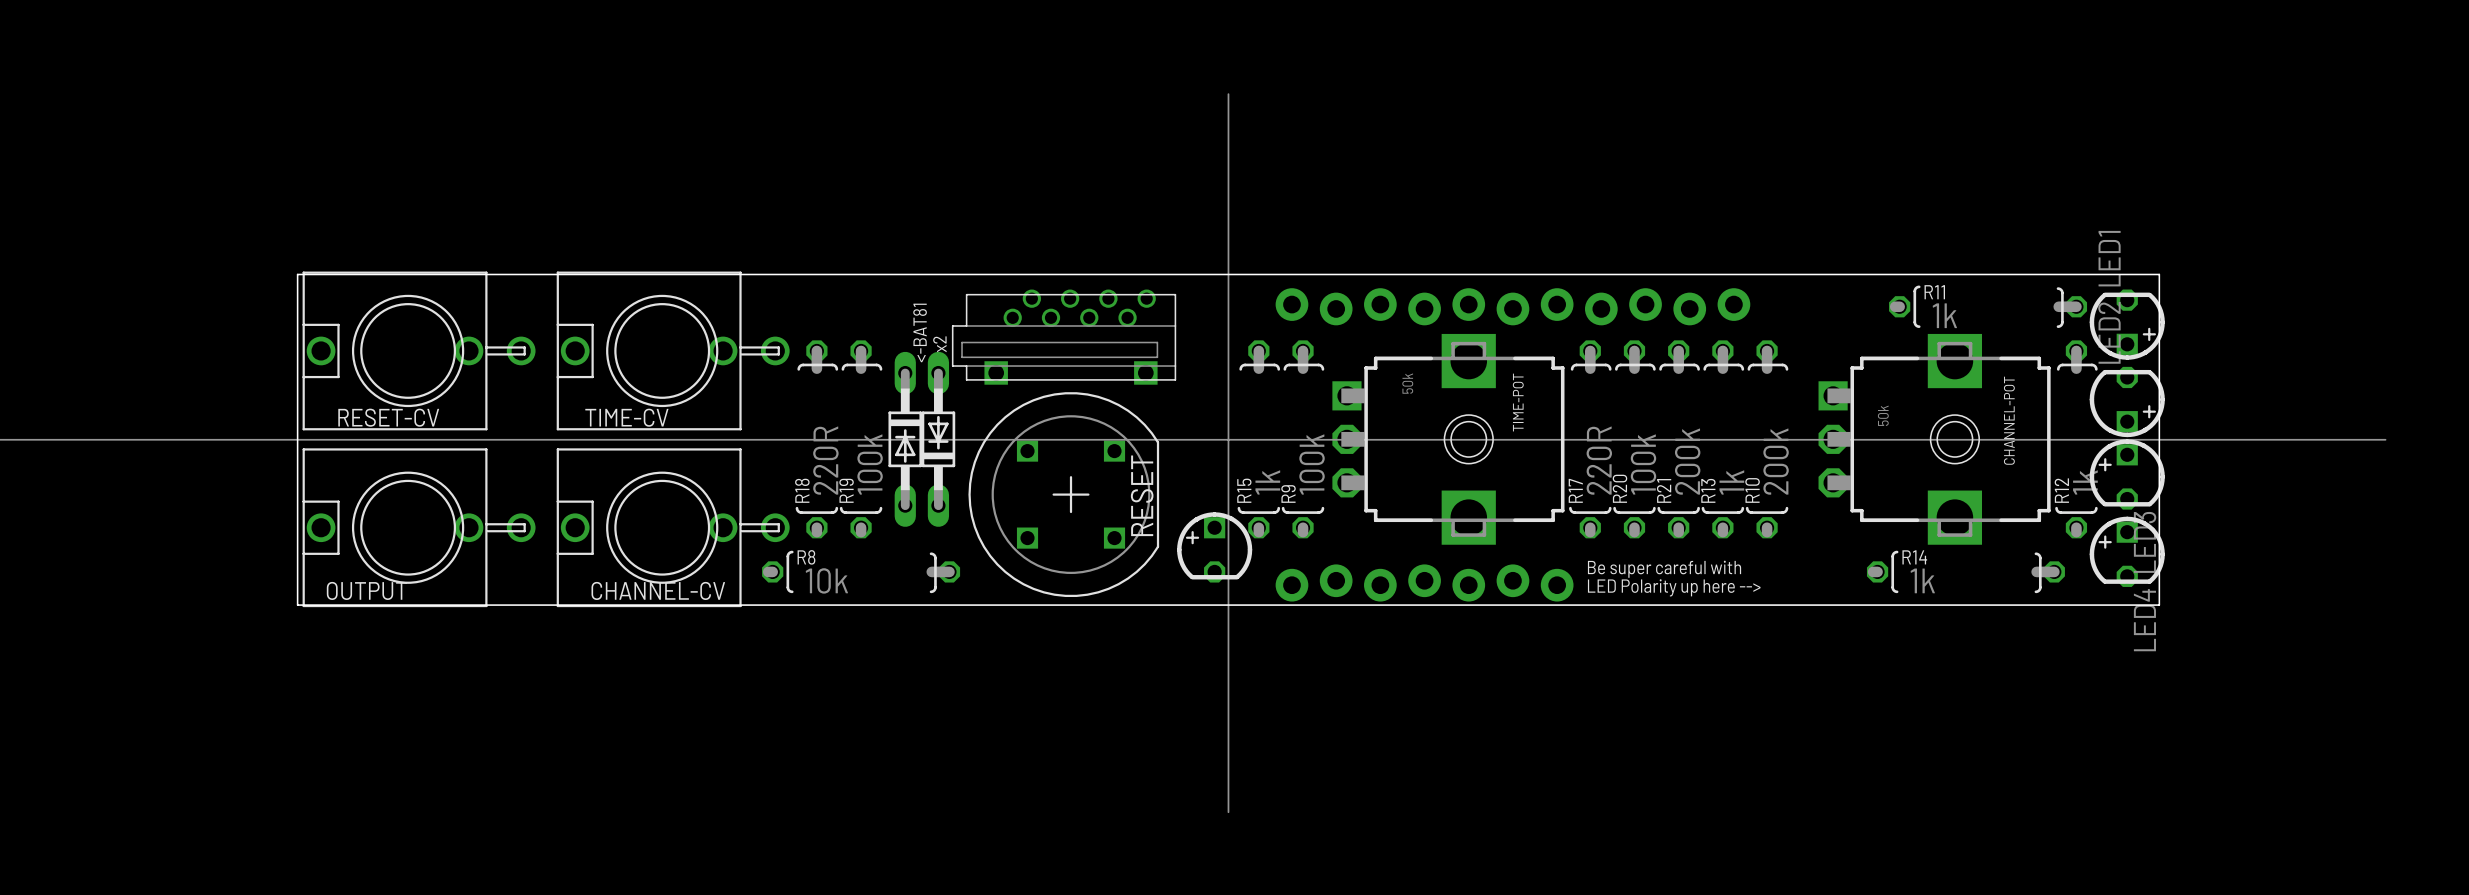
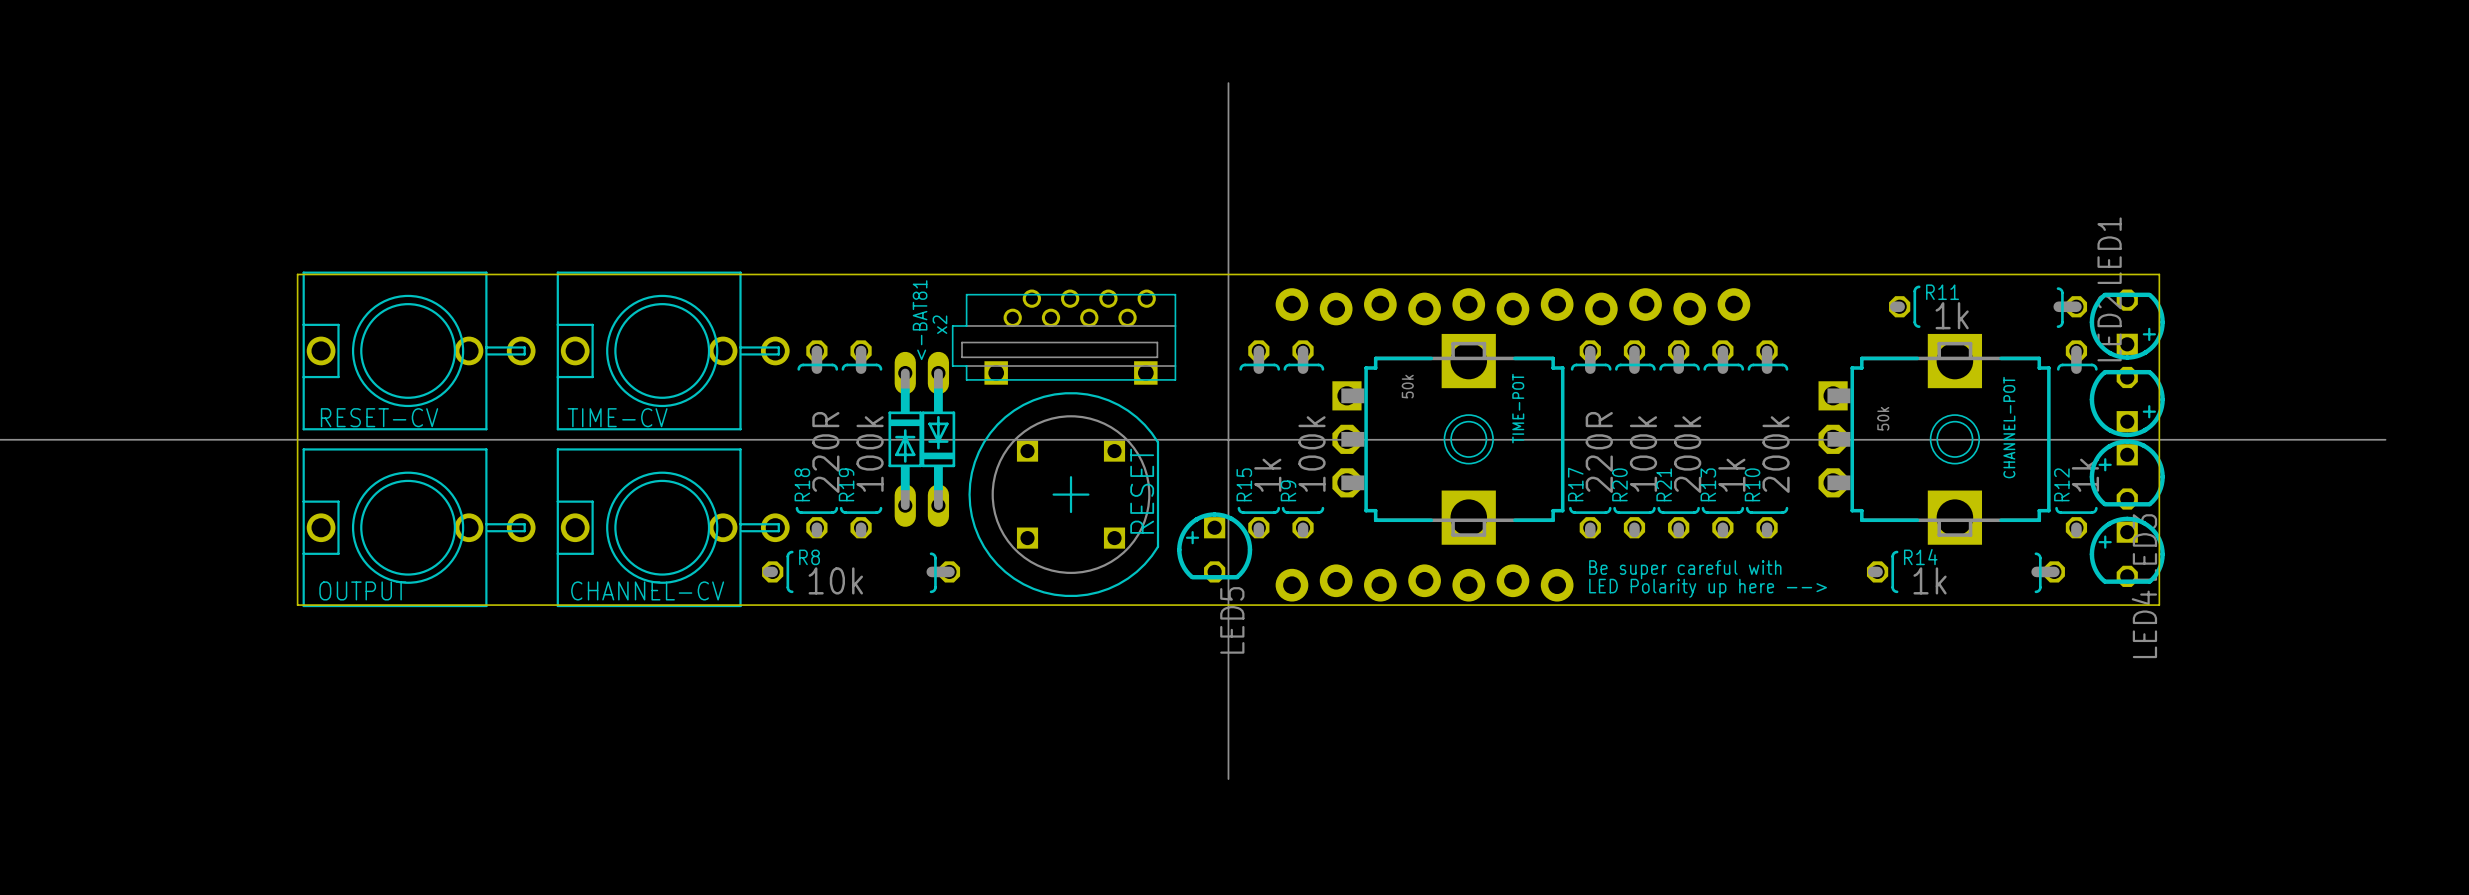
line: none -> (1228, 83) (1228, 94)
LED5 name: none -> LED5 (1232, 620)
line: (1228, 779) (1228, 812) -> none

